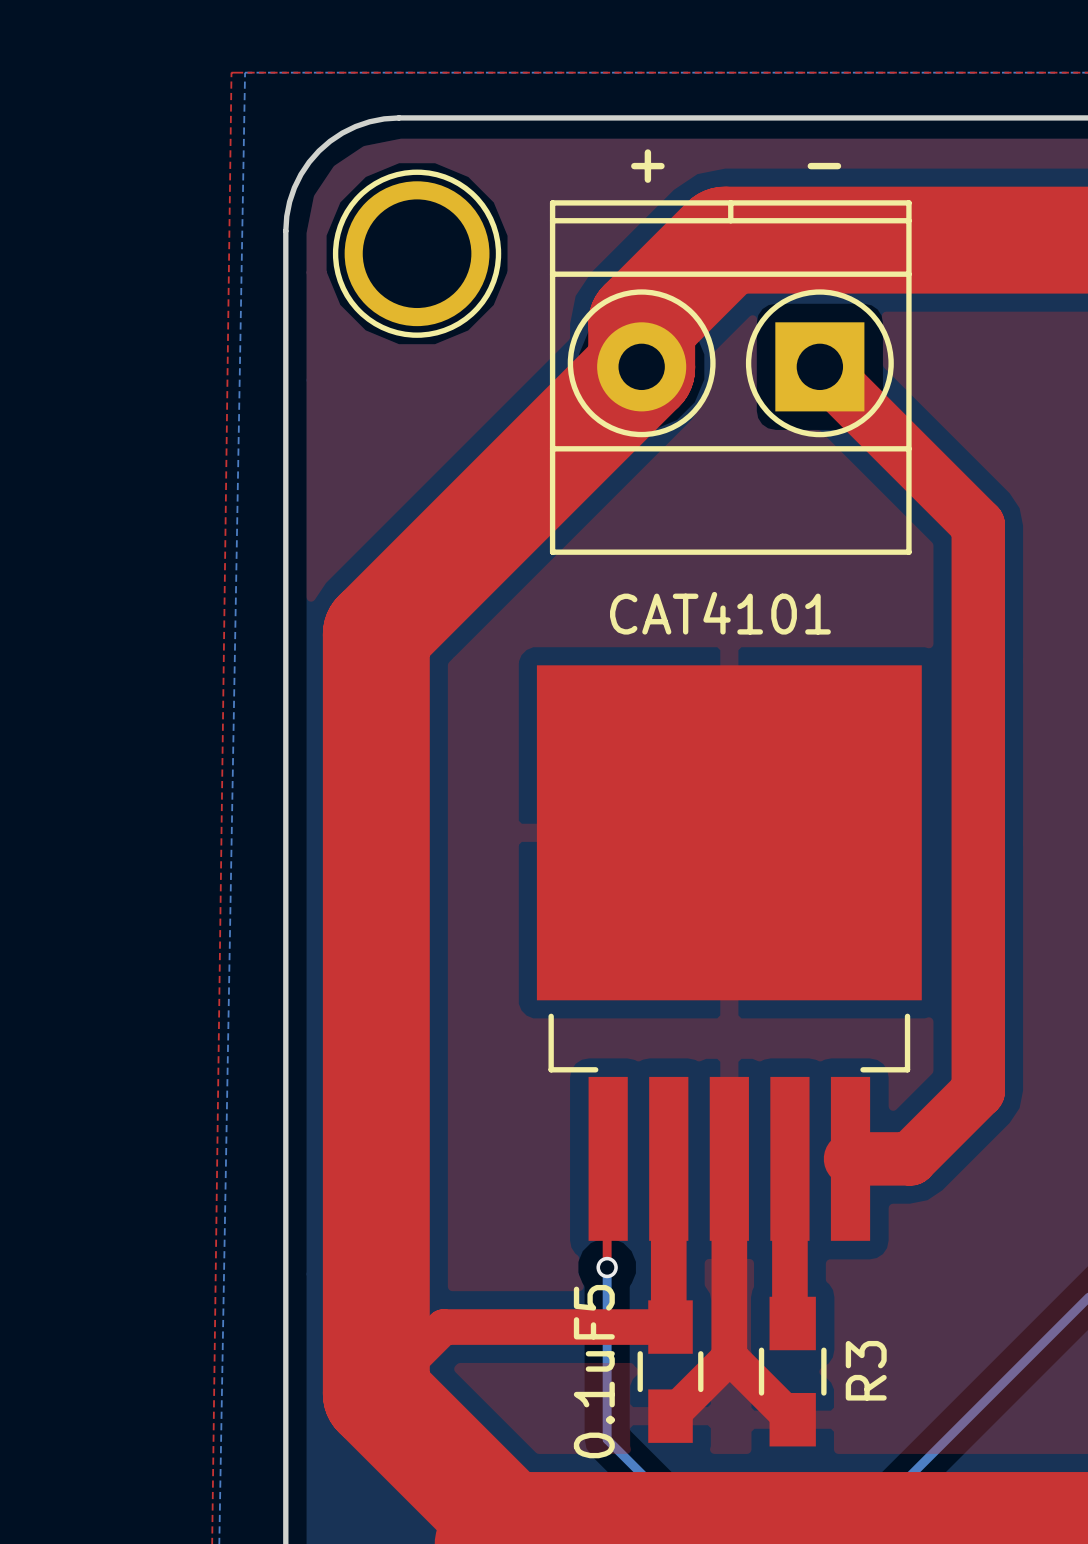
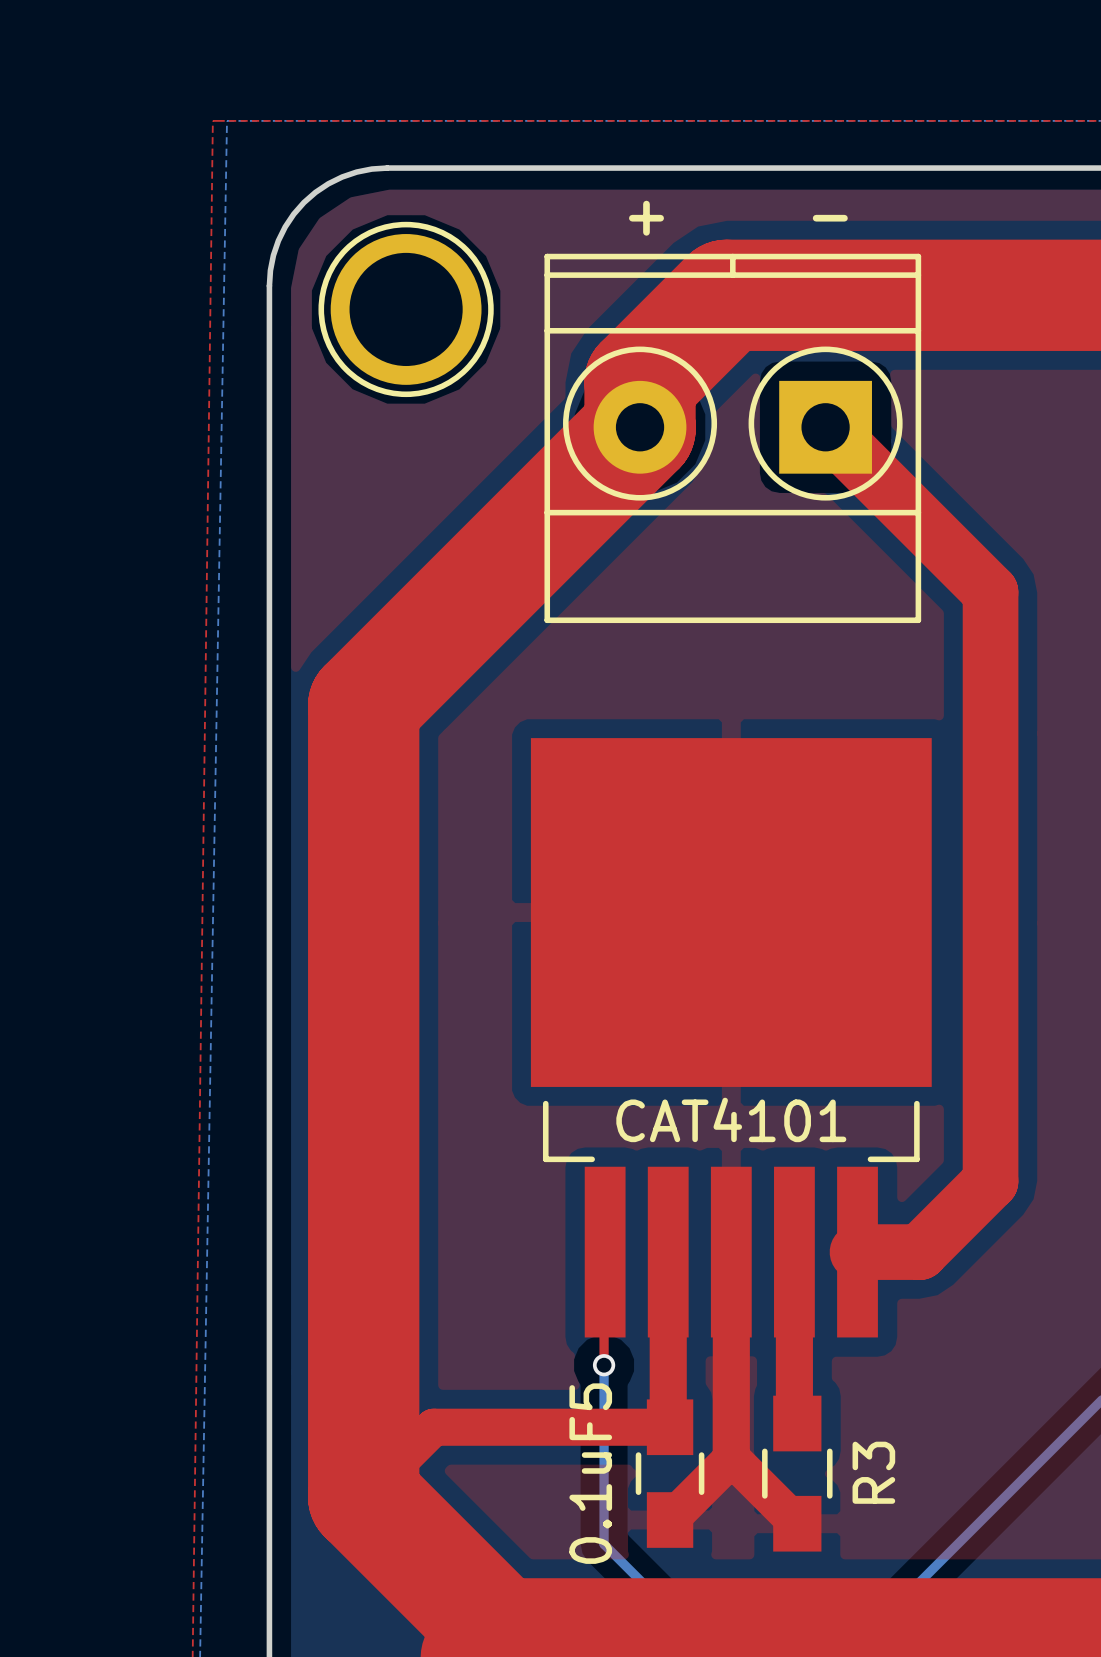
CAT4101 value: CAT4101 (720, 613) -> none
CAT4101 name: none -> CAT4101 (731, 1119)

